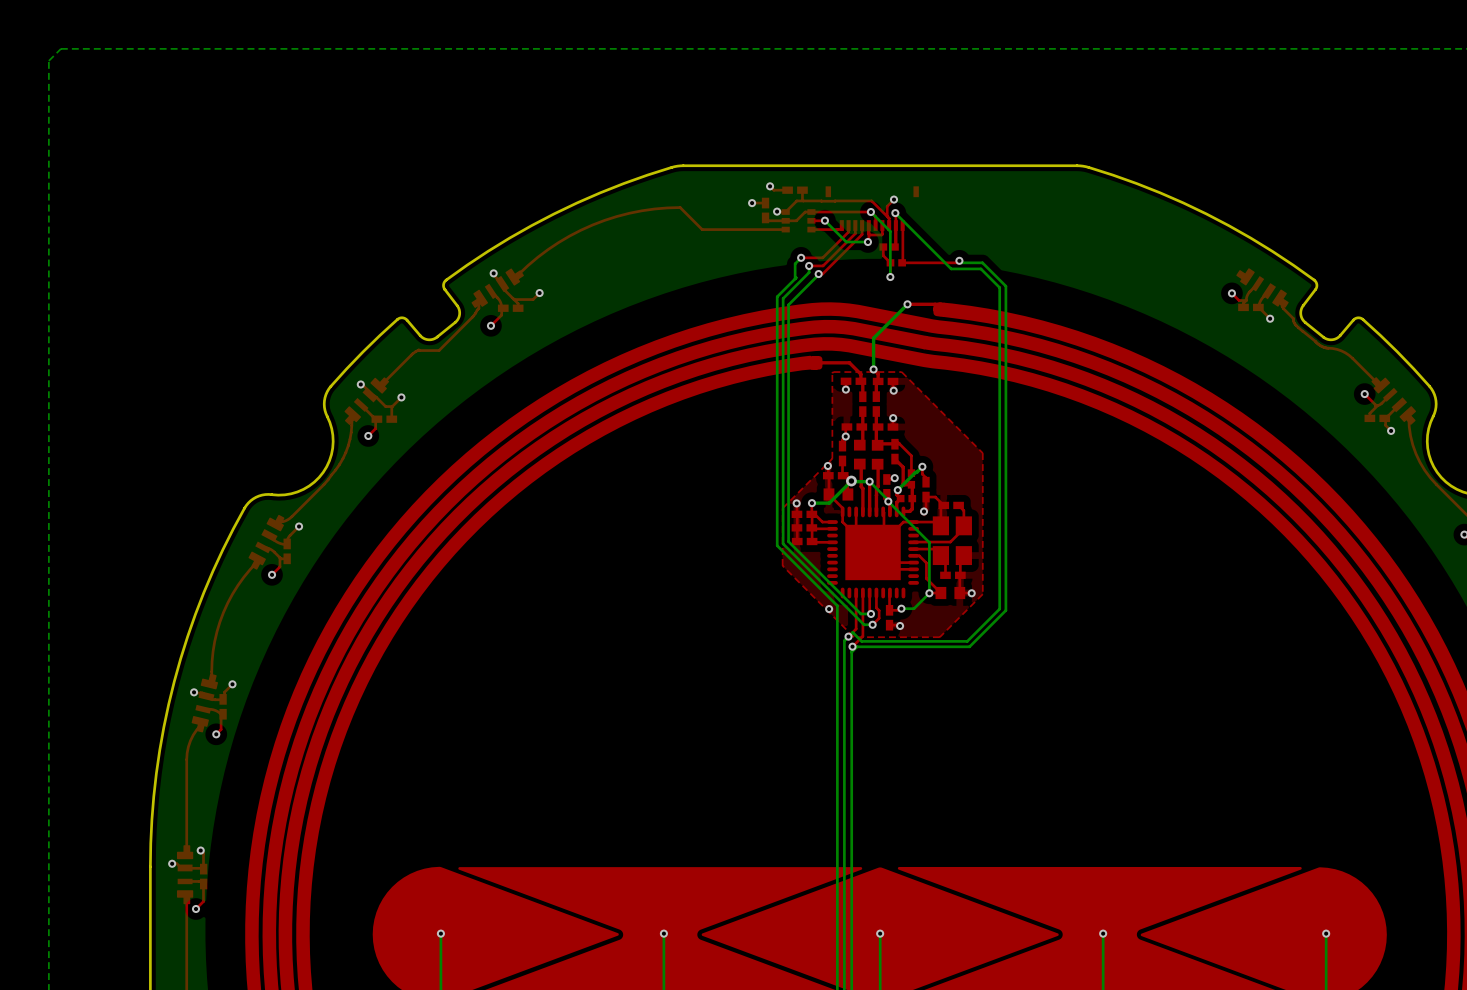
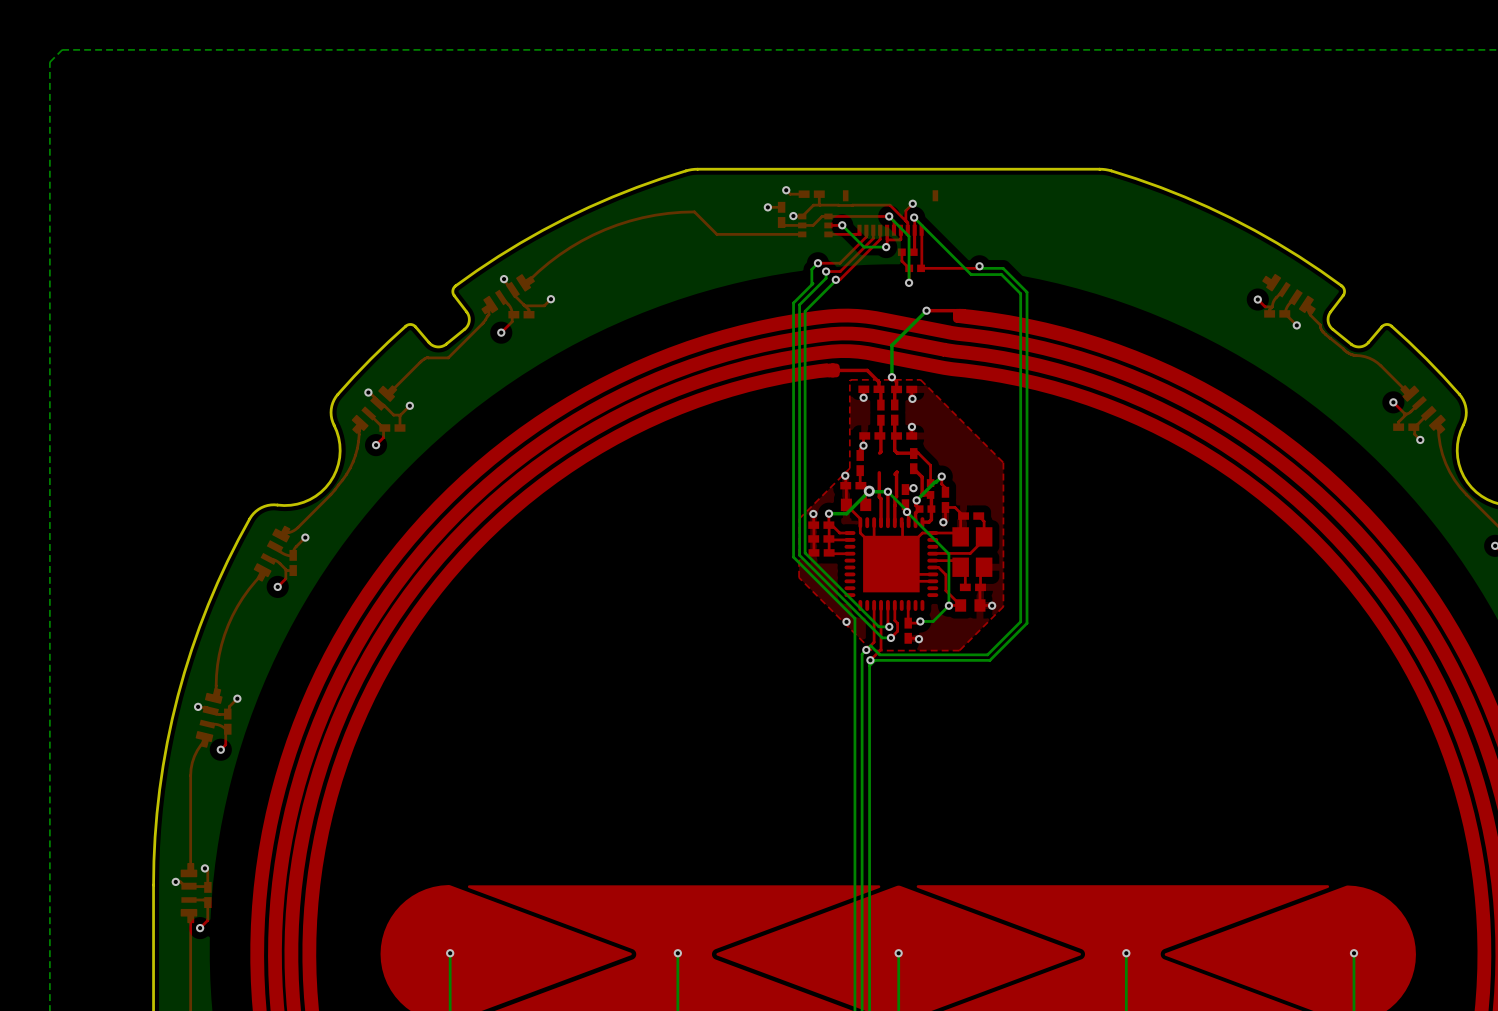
part: (859, 454) -> none
part: (877, 454) -> none

